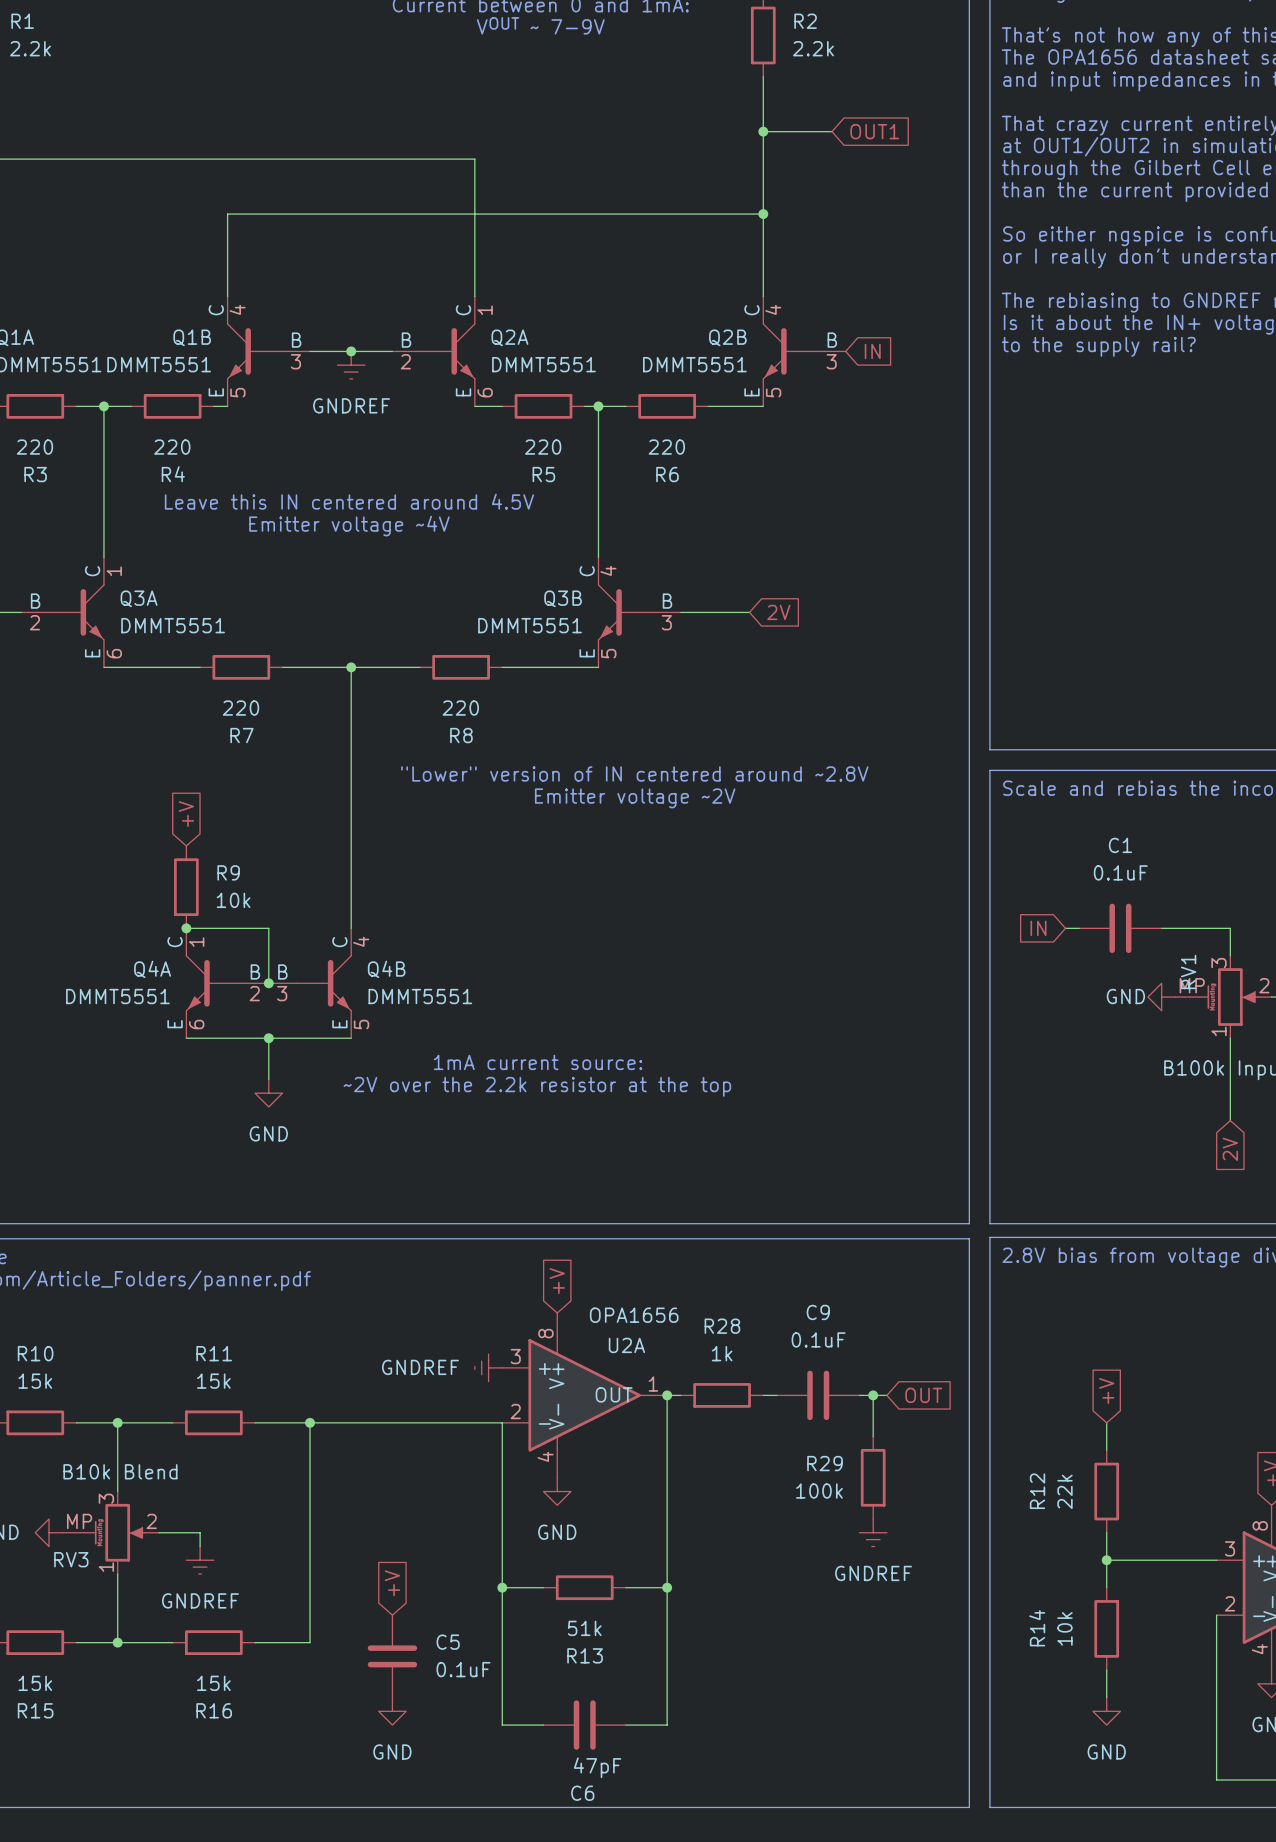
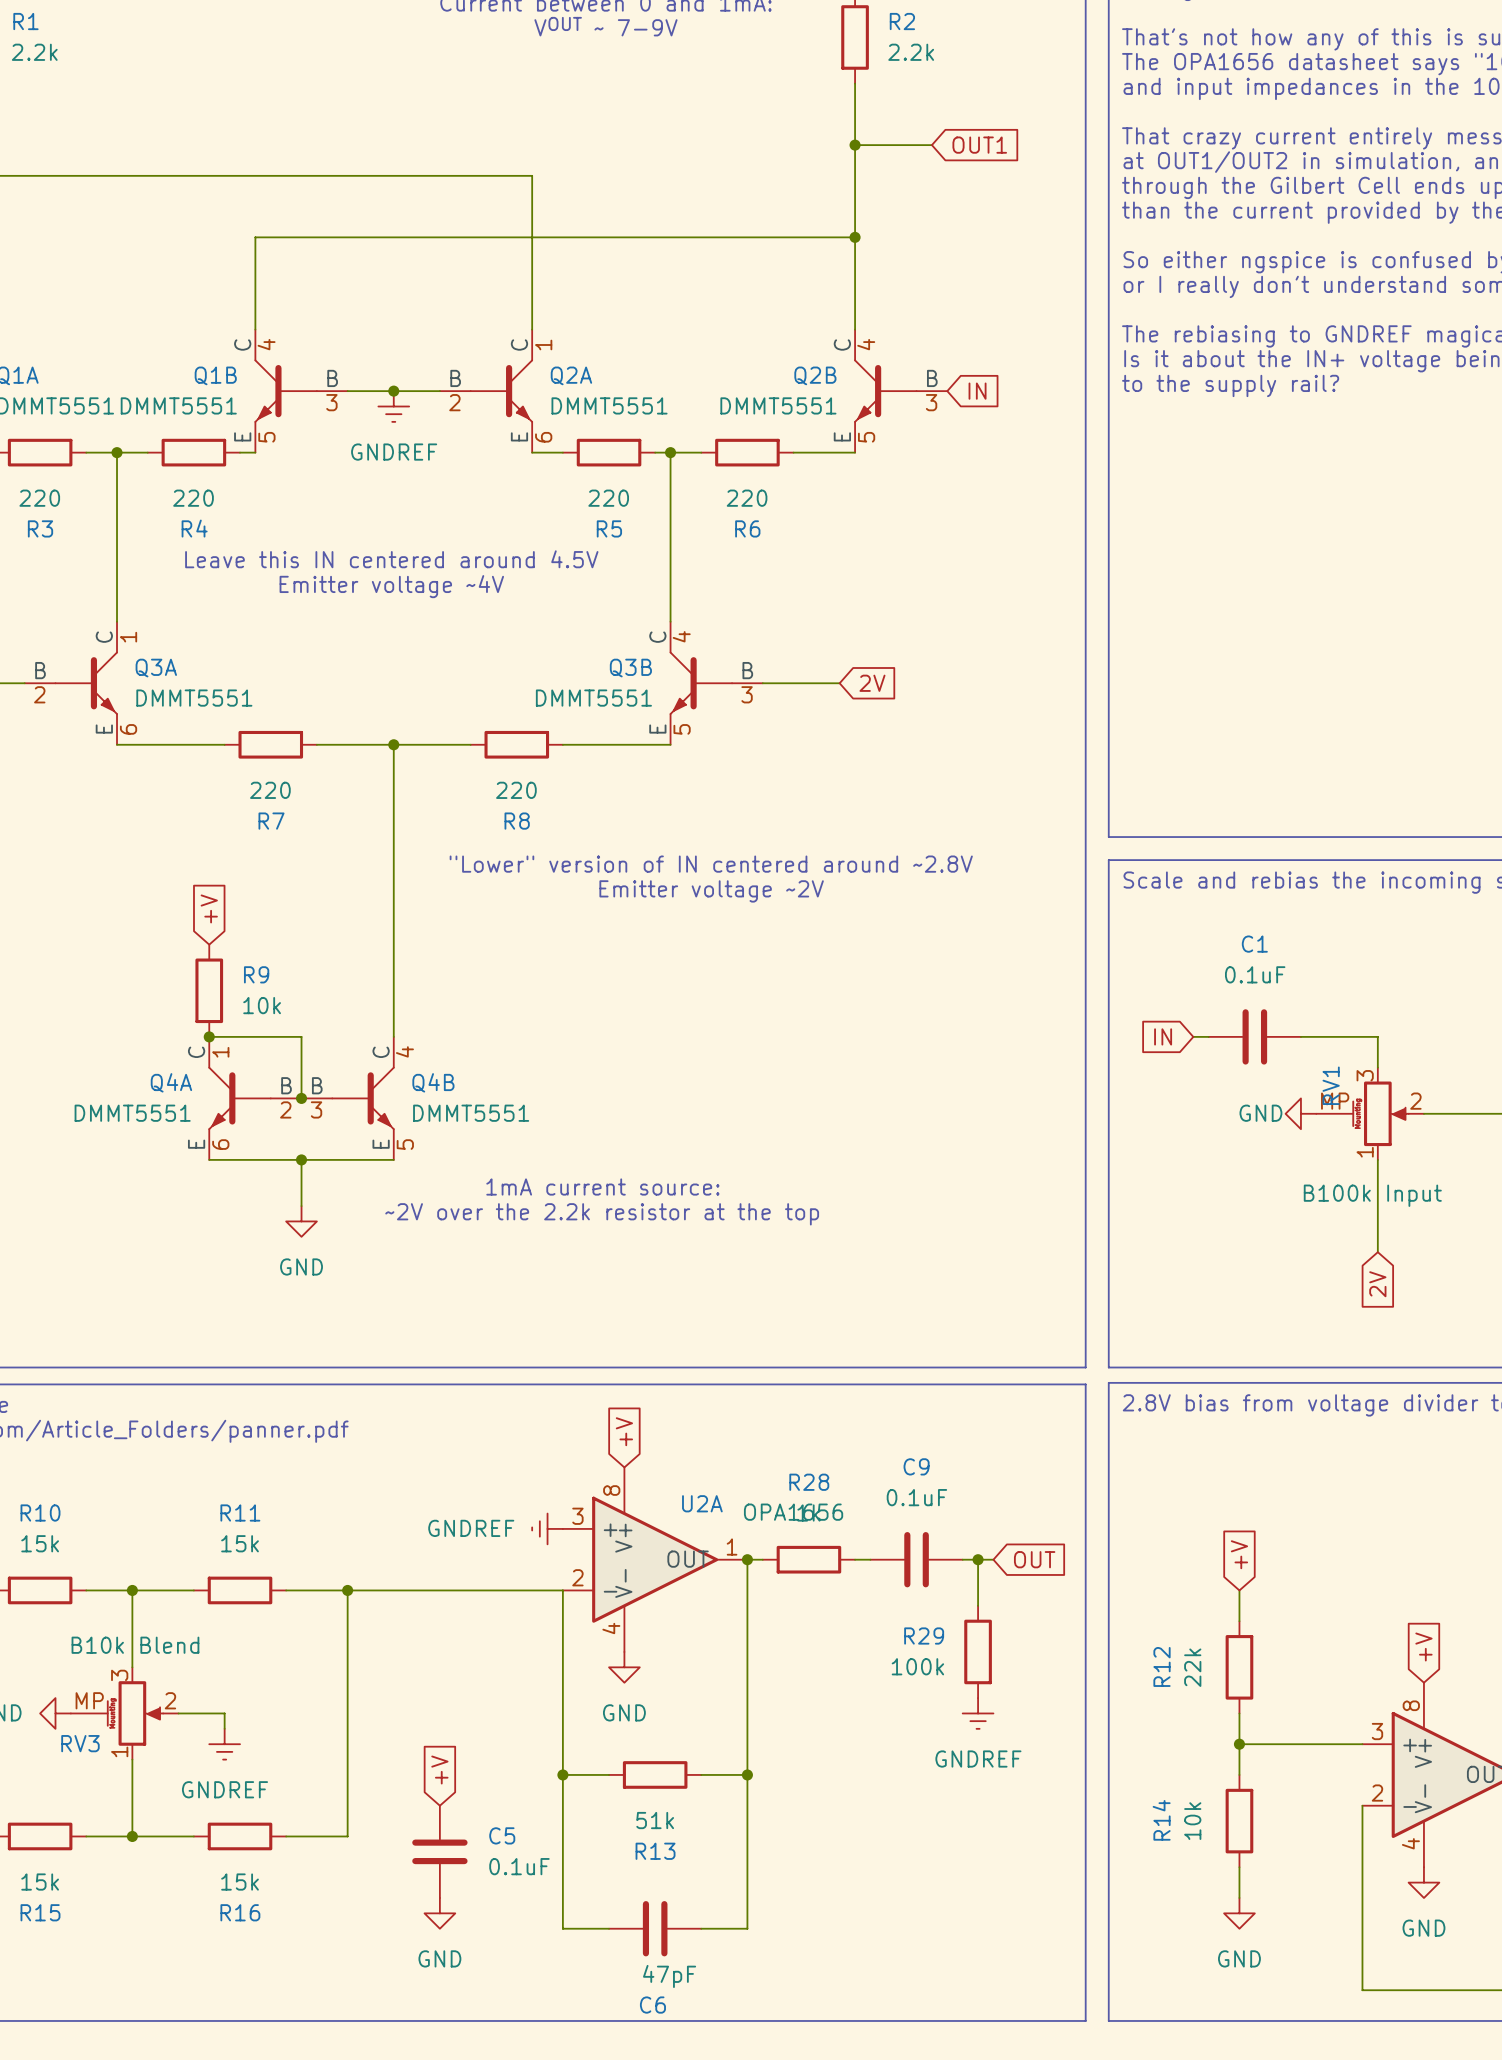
U2A value position: OPA1656 (634, 1315) -> OPA1656 (793, 1512)

